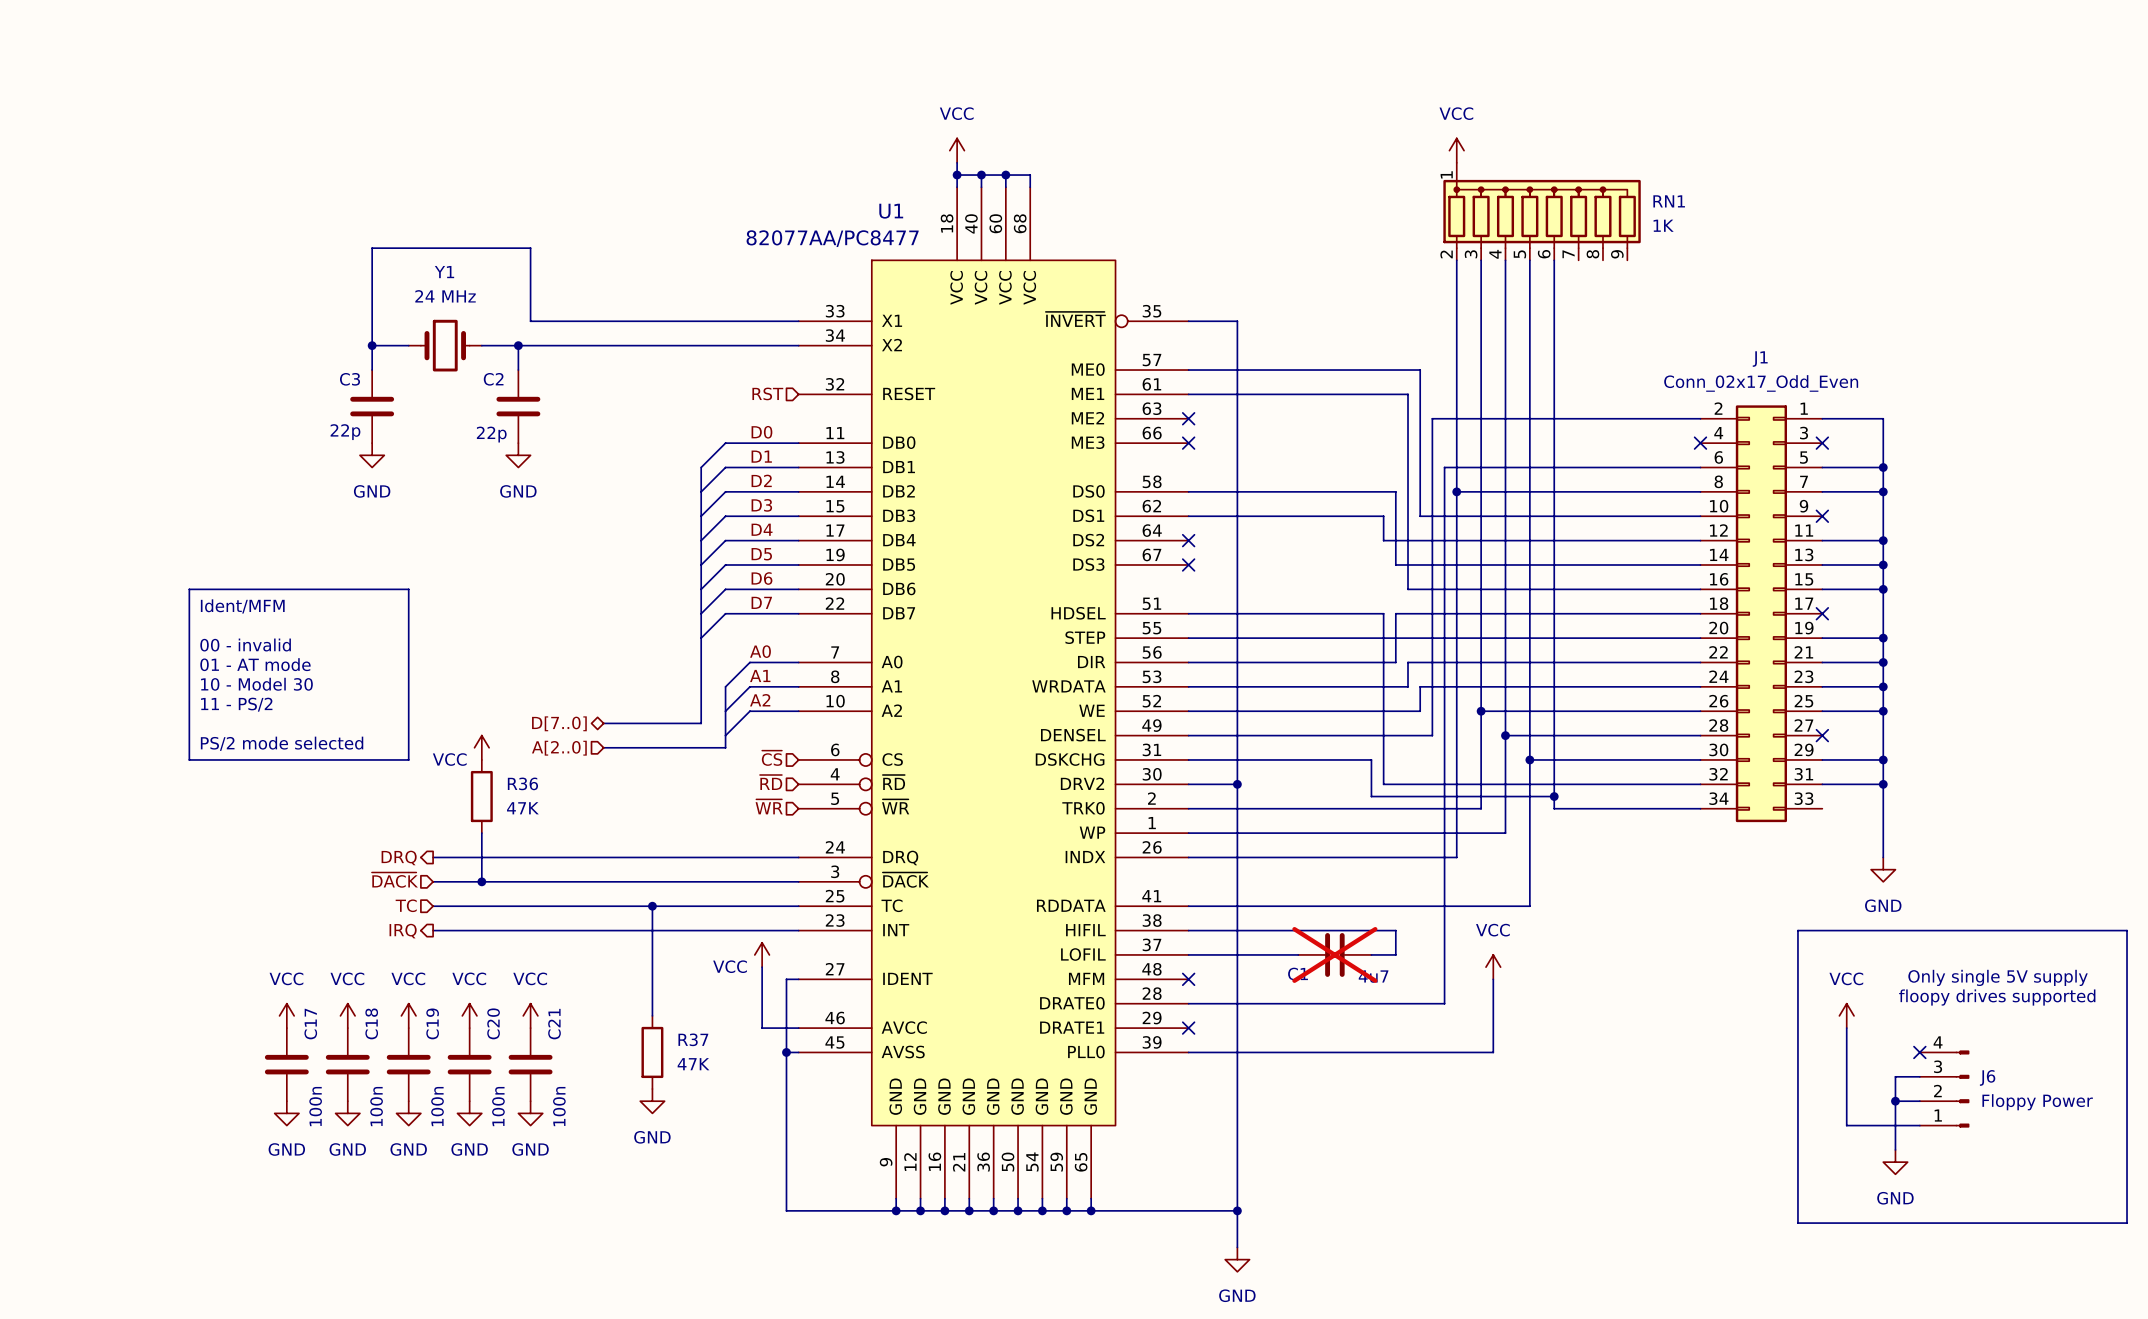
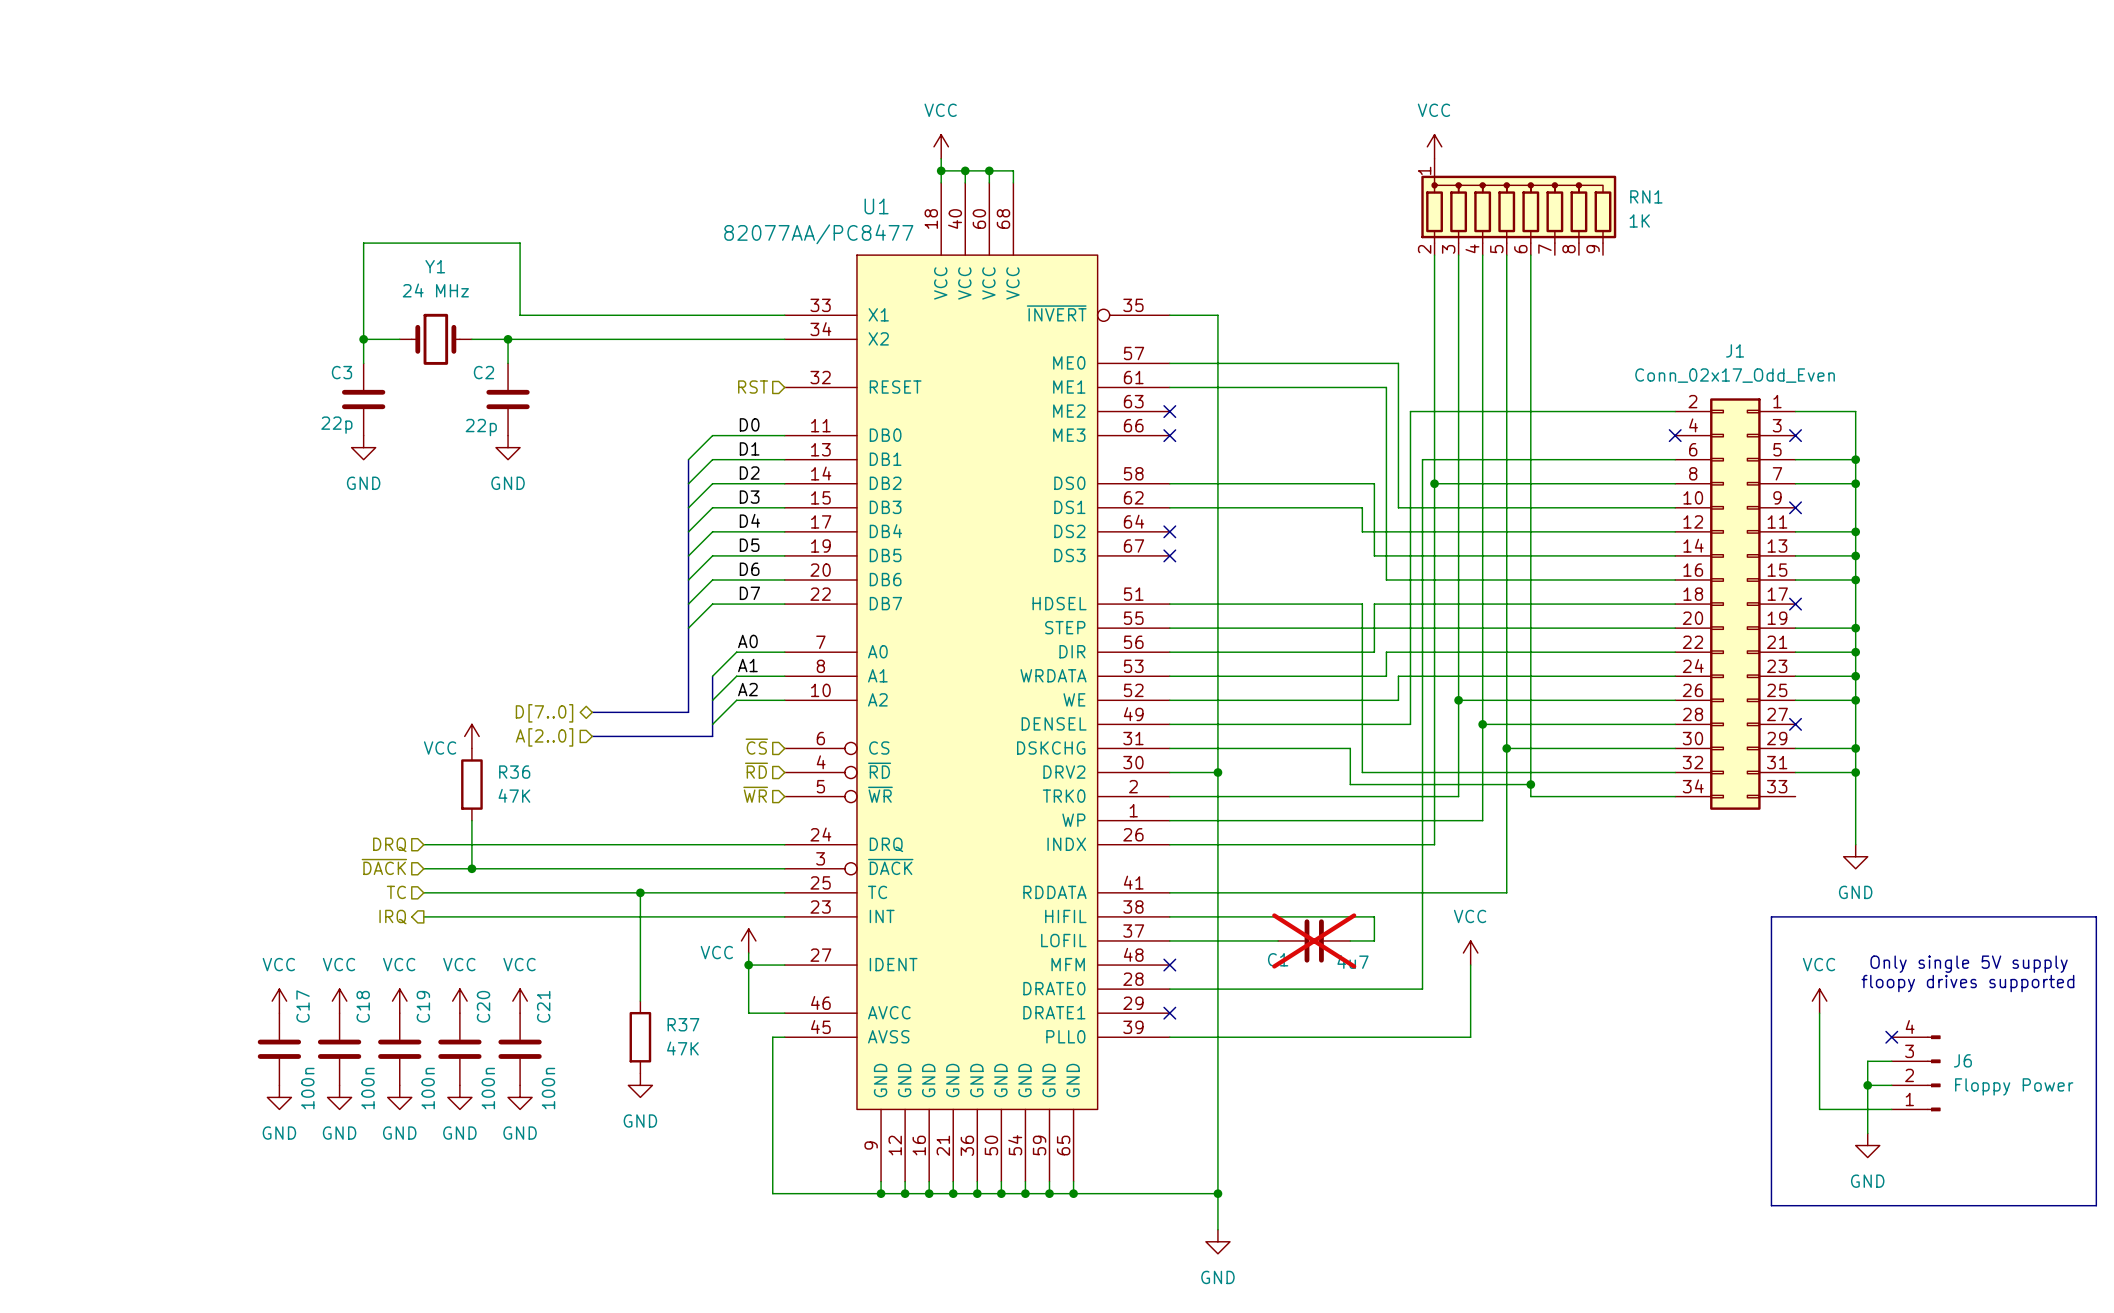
line: (189, 589) (408, 589) (408, 759) (189, 759) (189, 589) -> none
text: Ident/MFM (242, 606) -> none
text: 00 - invalid (245, 645) -> none
text: 01 - AT mode (255, 664) -> none
text: 10 - Model 30 (256, 684) -> none
text: 11 - PS/2 (236, 704) -> none
text: PS/2 mode selected (282, 743) -> none
hierarchical label shape: output (399, 857) -> input (389, 844)
junction: none -> (748, 965)
wire: (786, 979) (786, 1052) -> (772, 965) (748, 965)
junction: (786, 1052) -> none

